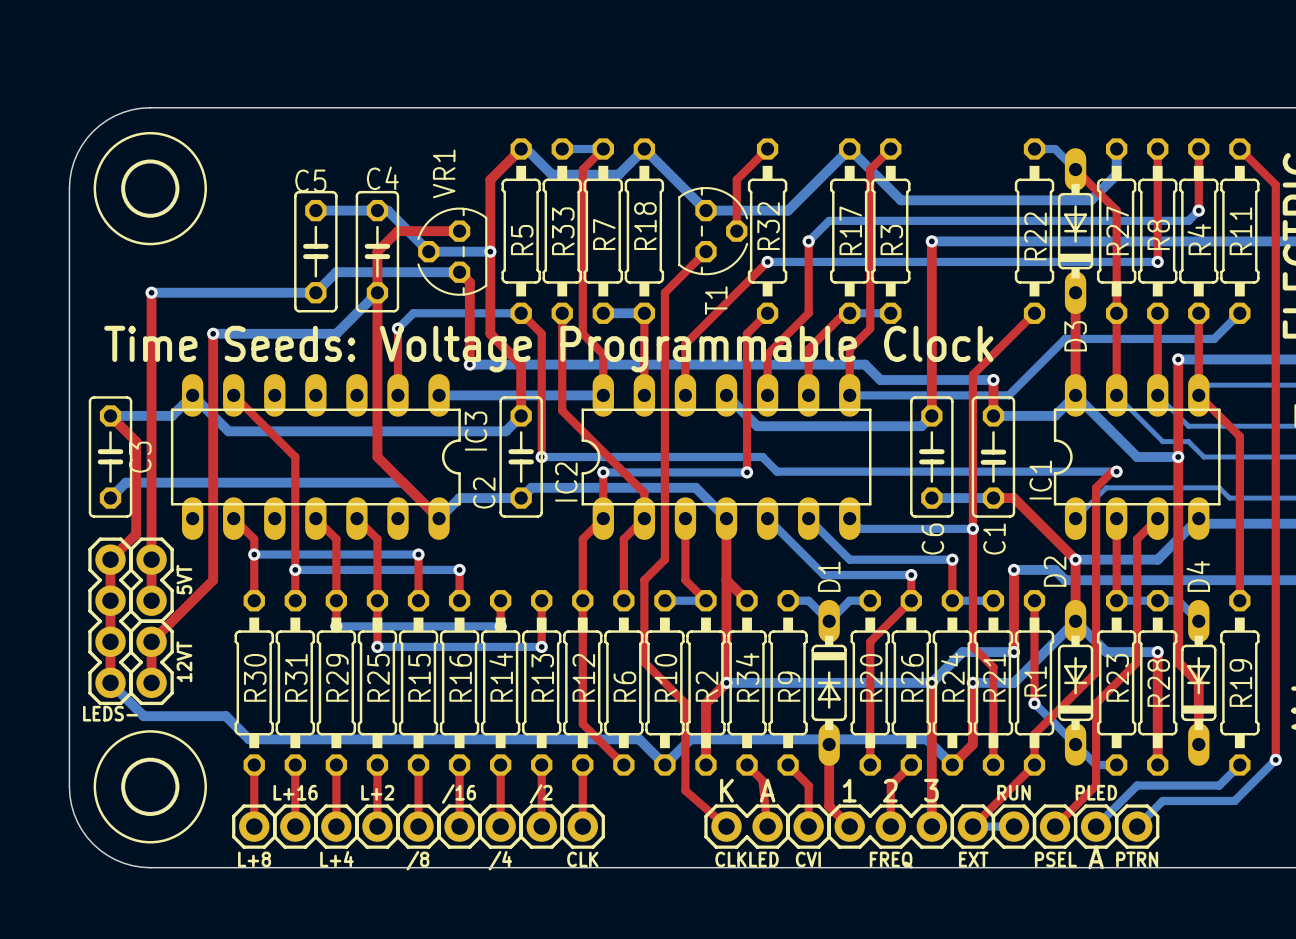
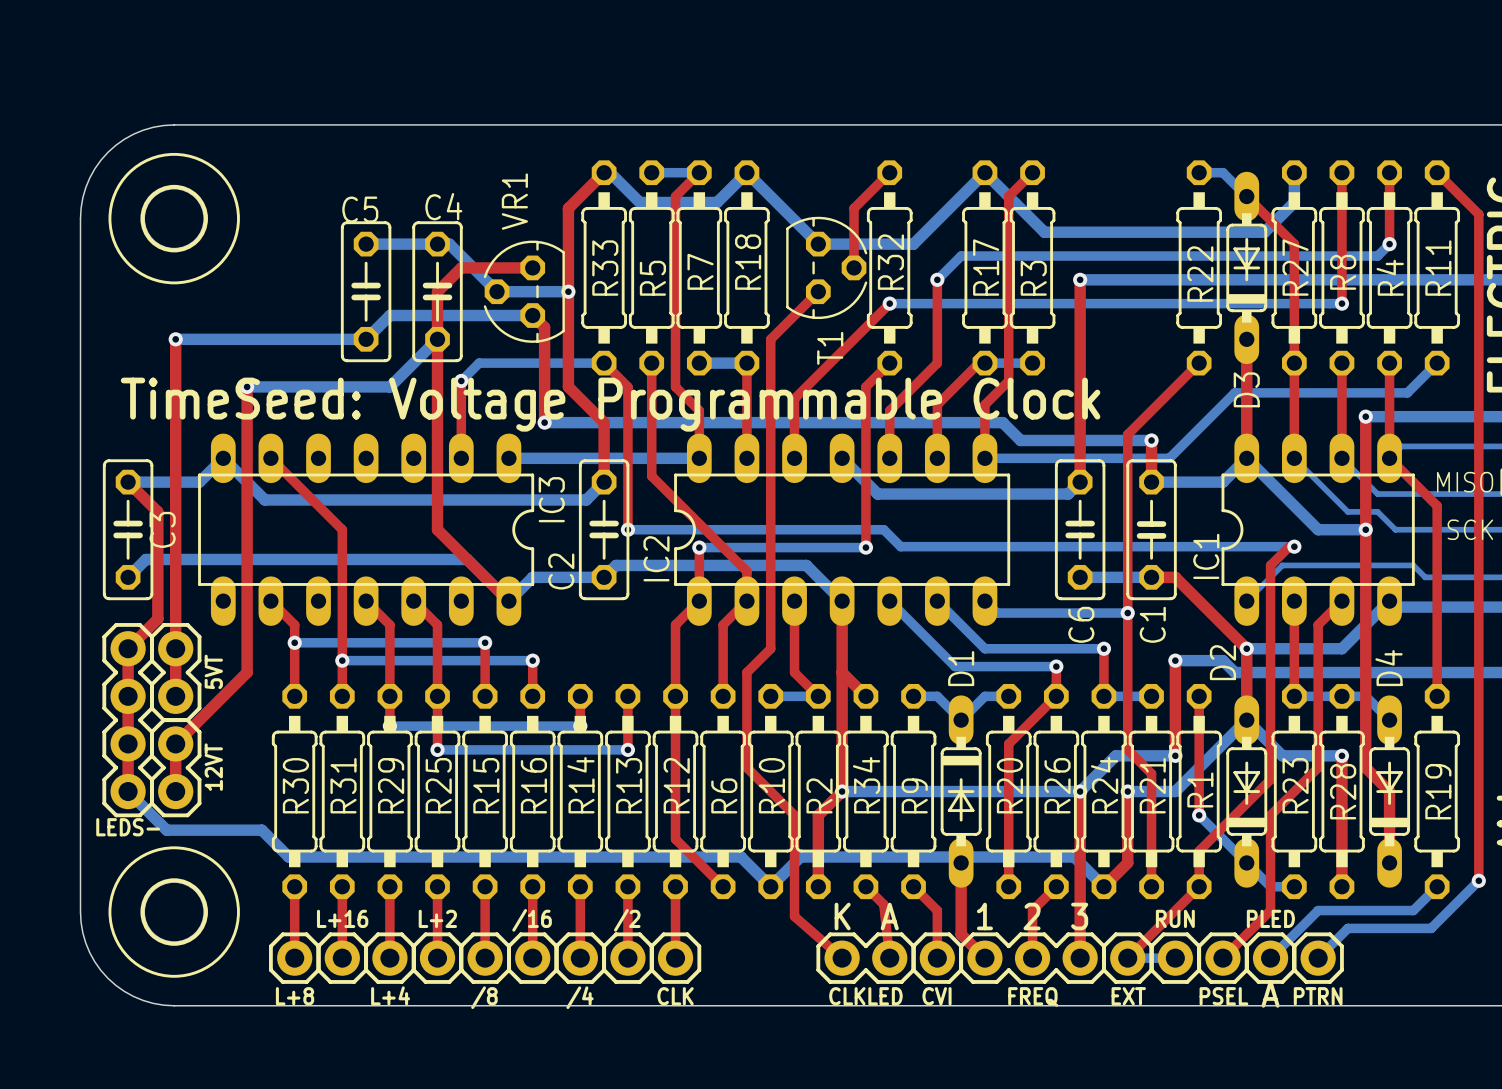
R33 name position: R33 (563, 231) -> R33 (605, 268)
R5 name position: R5 (522, 240) -> R5 (652, 278)
text: Time Seeds: Voltage Programmable Clock (548, 349) -> TimeSeed: Voltage Programmable Clock (610, 404)
text: none -> MISO (1465, 482)
text: none -> SCK (1470, 529)

